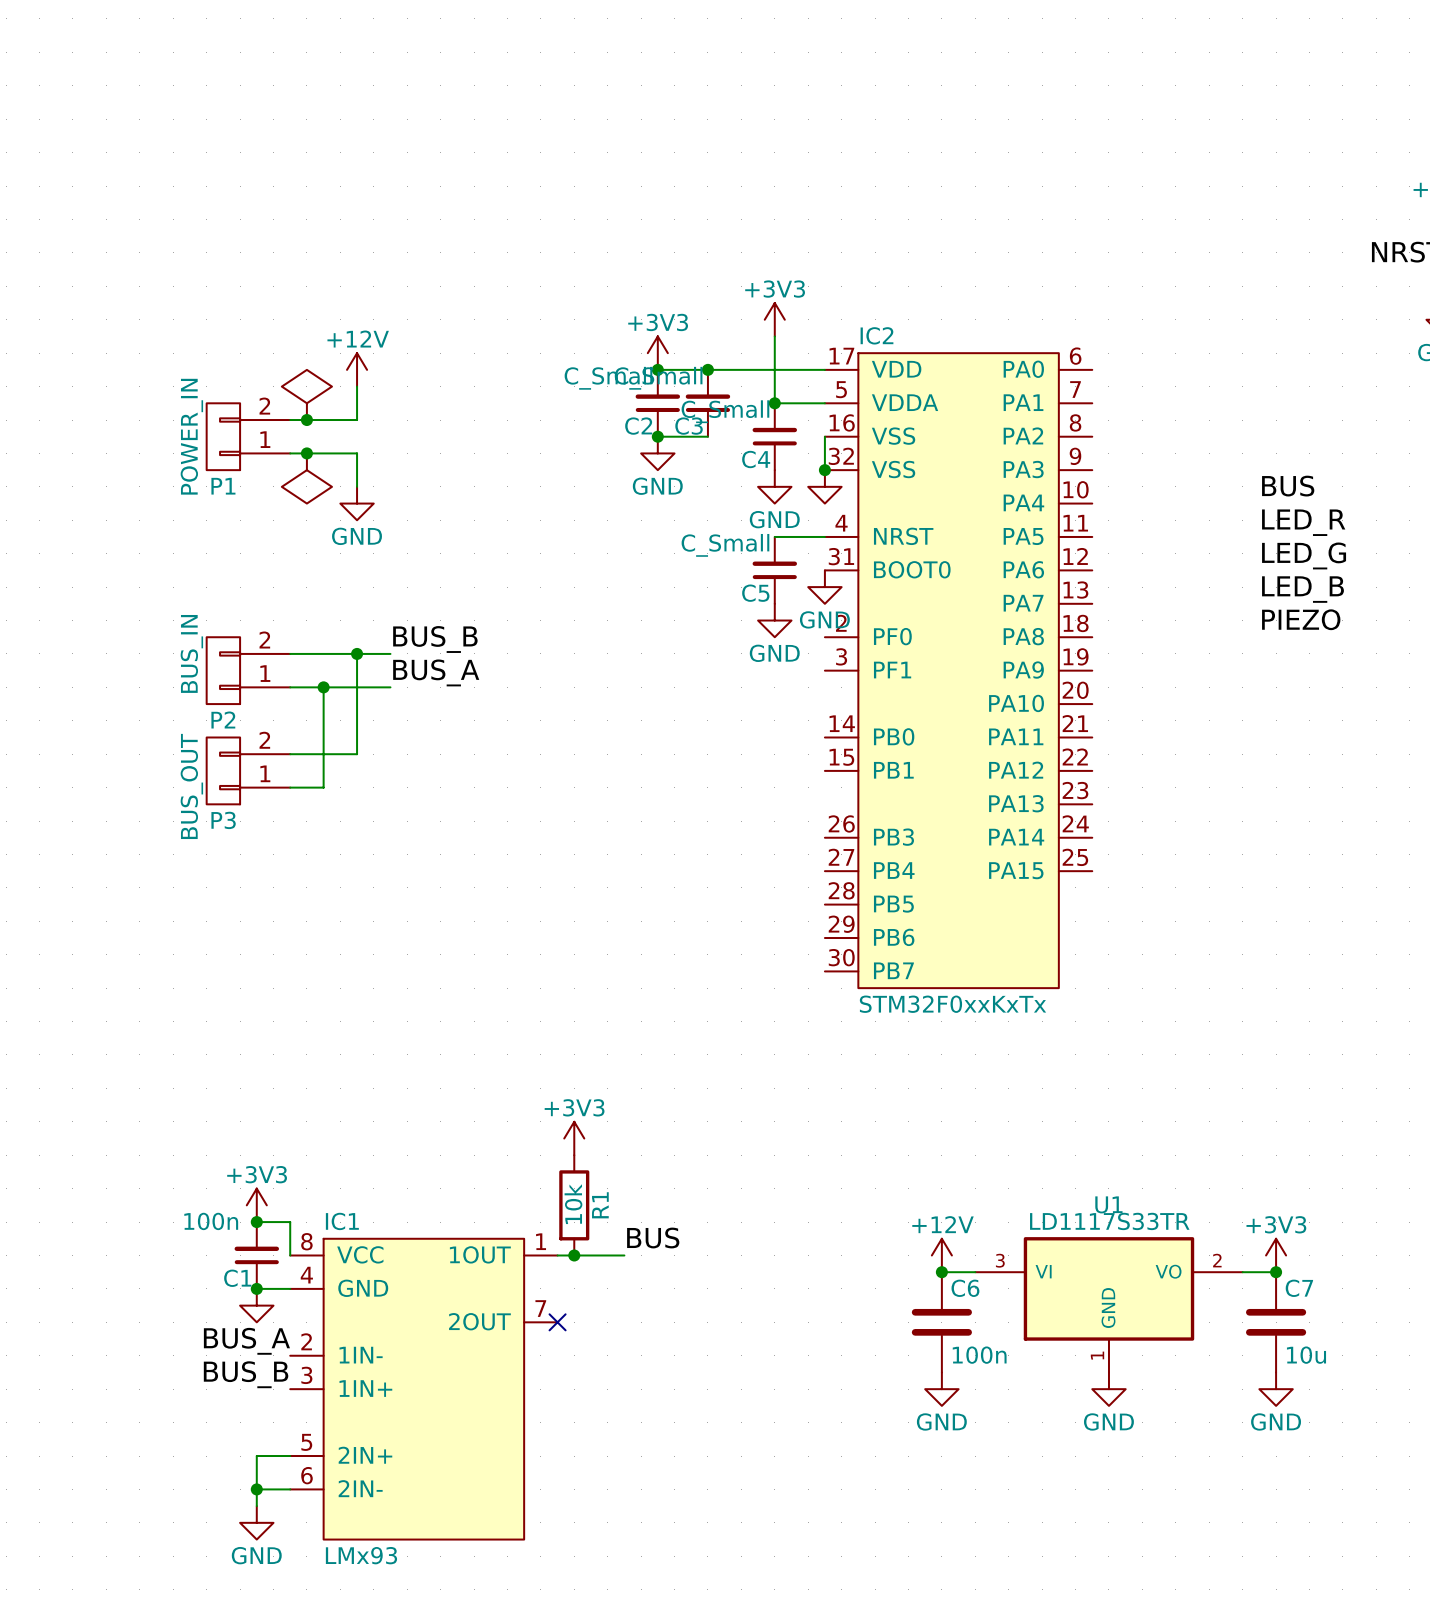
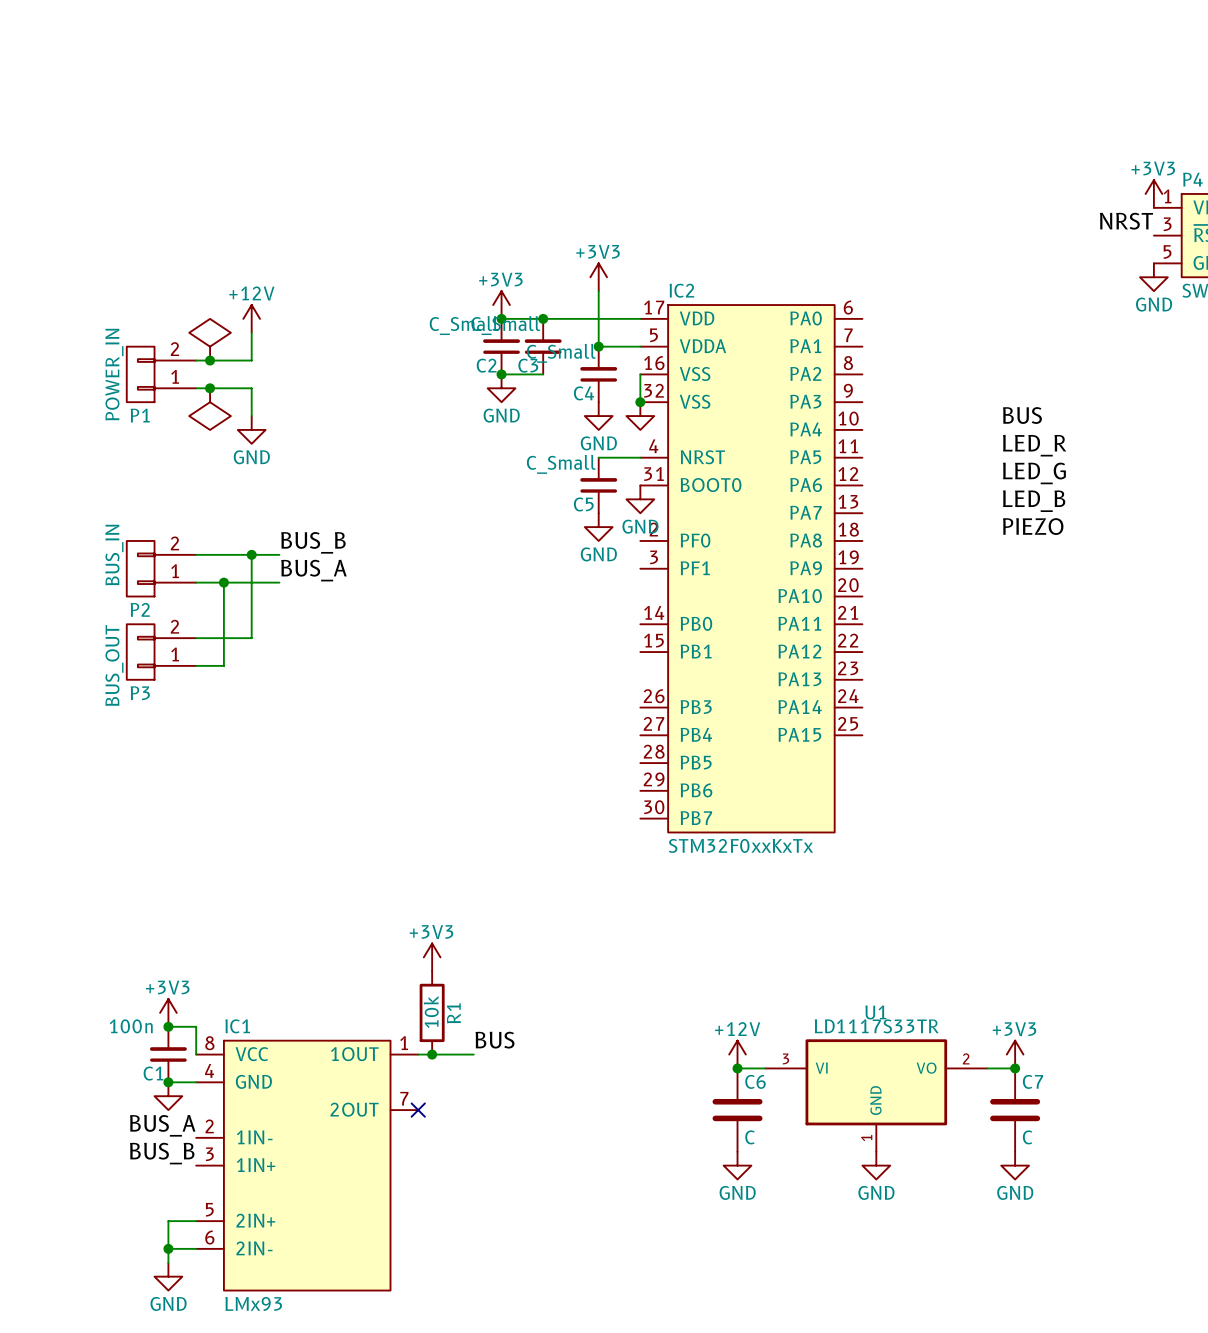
C6 value: 100n (979, 1355) -> C (749, 1137)
C7 value: 10u (1306, 1355) -> C (1027, 1137)

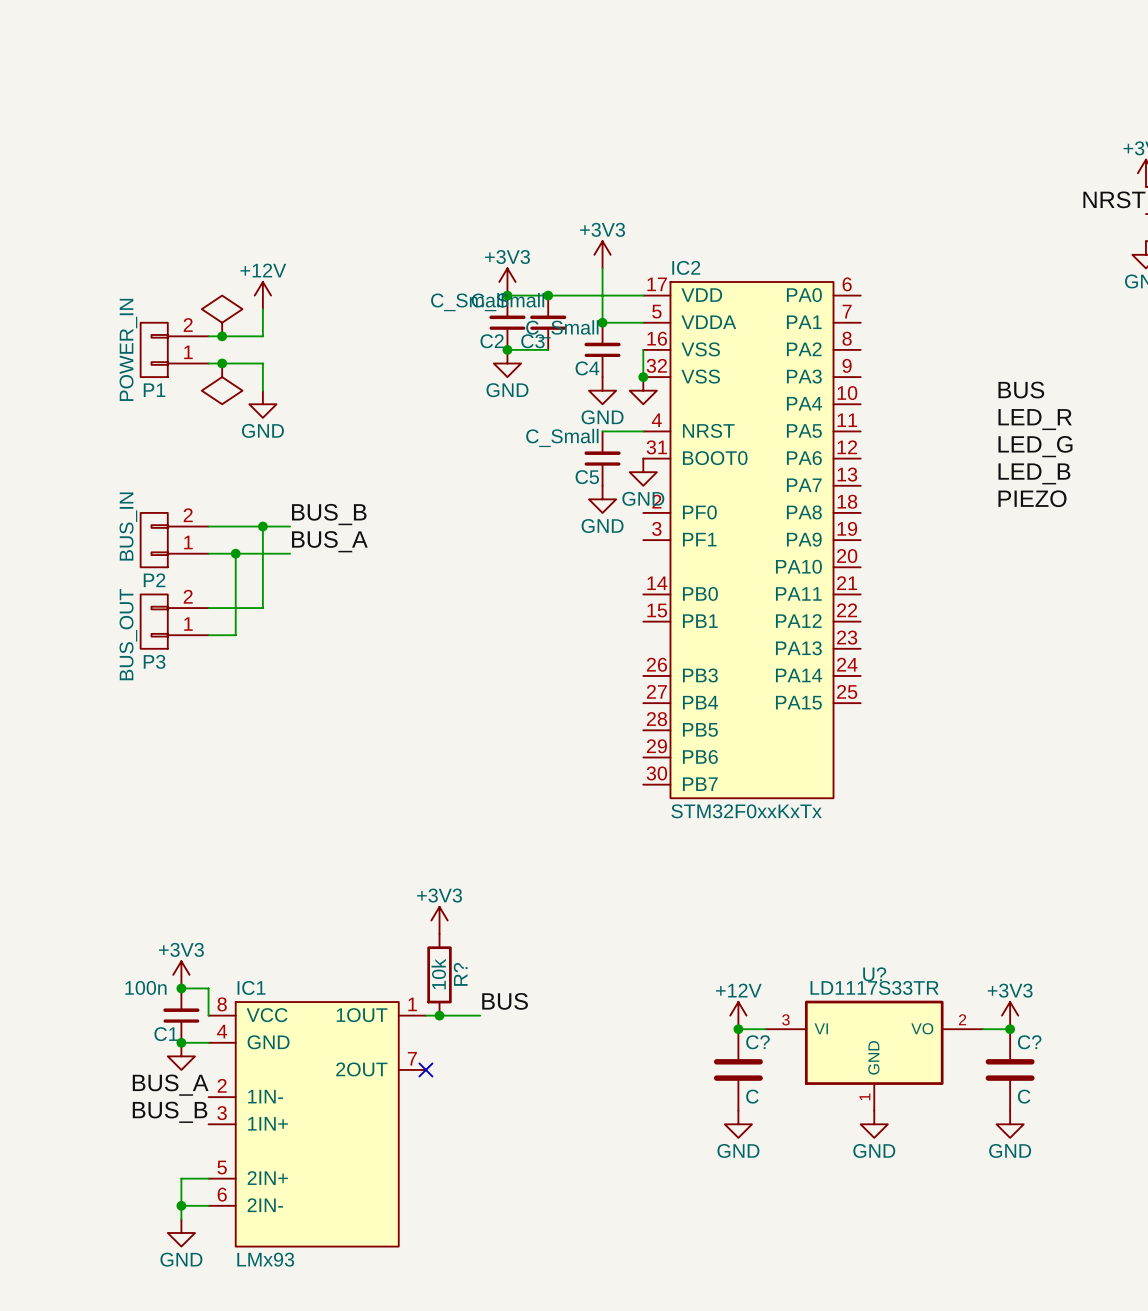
U1 name: U1 (875, 1012) -> U? (874, 974)
R1 name: R1 (453, 1013) -> R? (460, 974)
C6 name: C6 (755, 1081) -> C? (757, 1042)
C7 name: C7 (1032, 1081) -> C? (1029, 1042)

